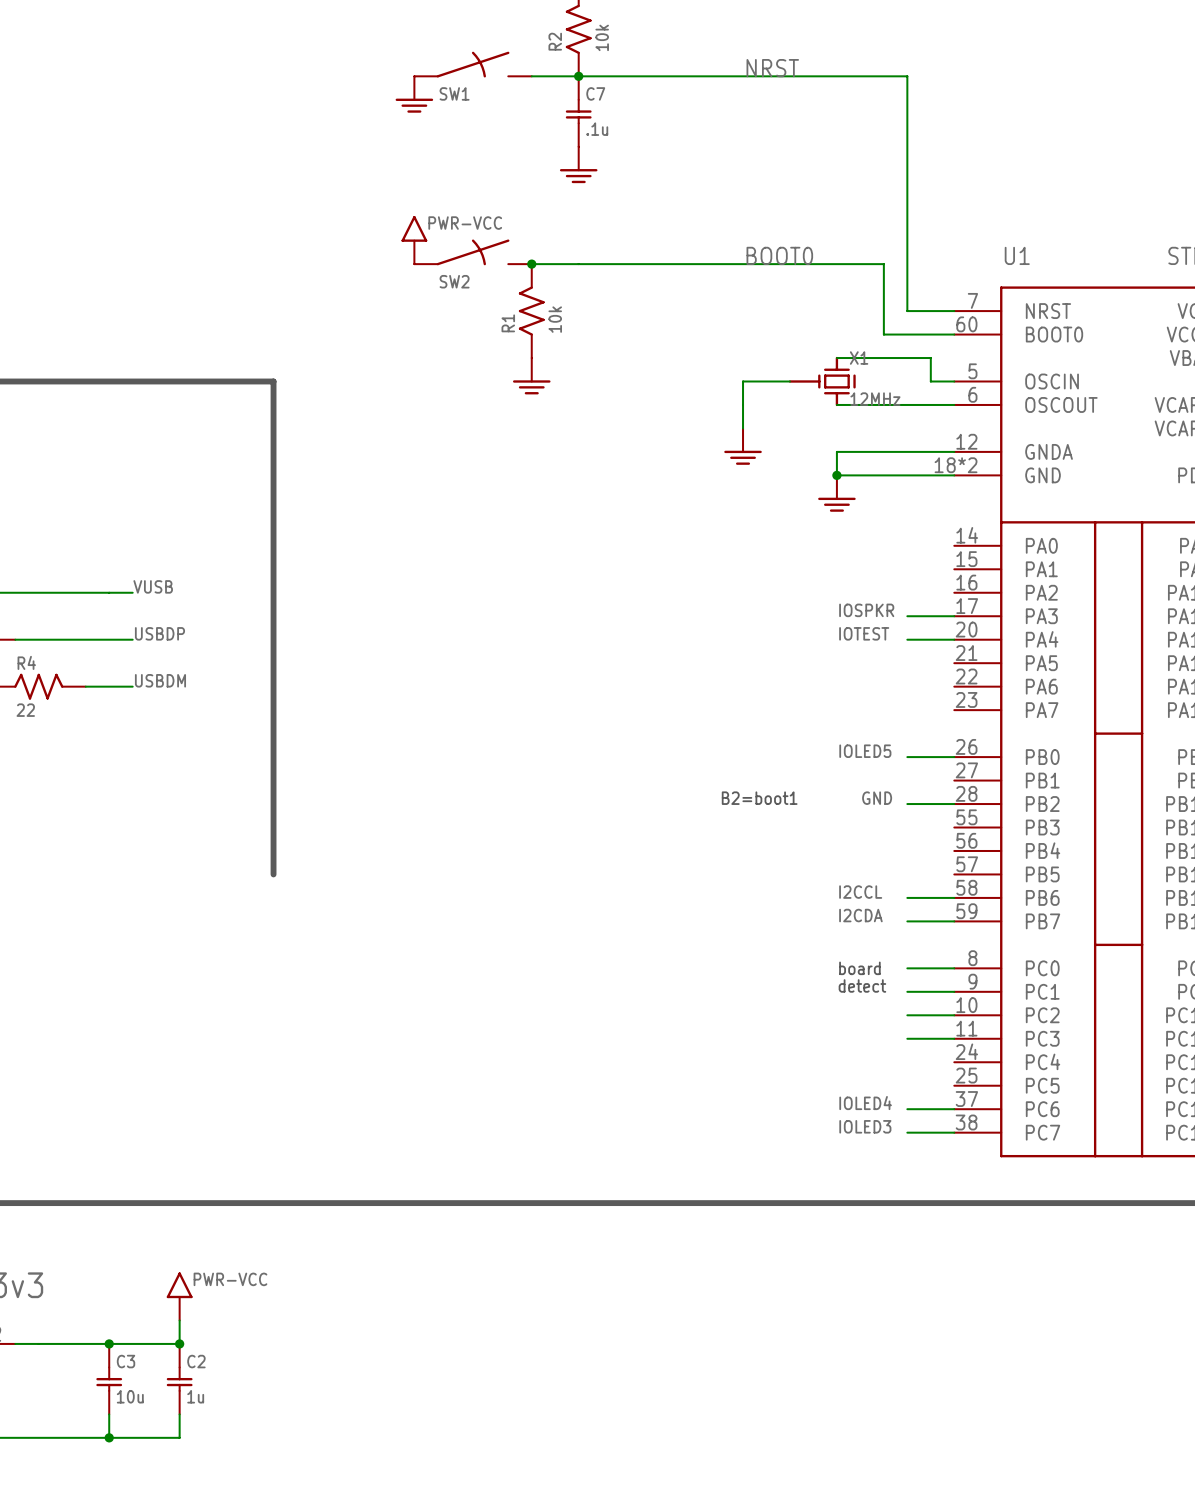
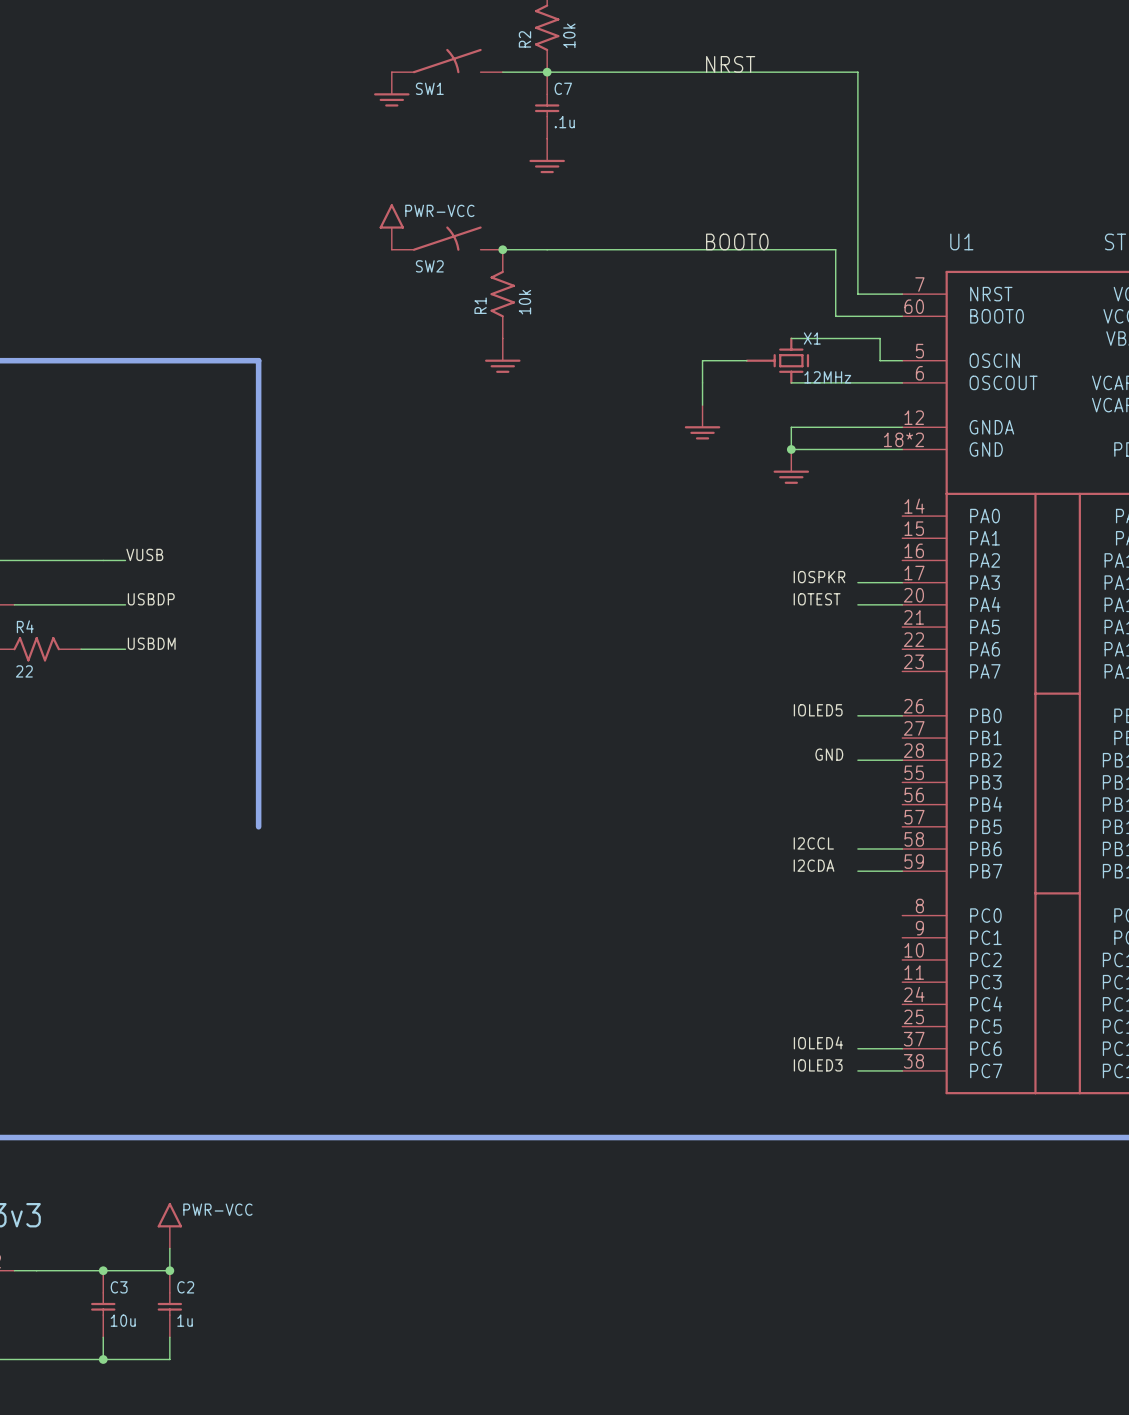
text: B2=boot1 (759, 798) -> none
text: board (859, 968) -> none
wire: (907, 968) (954, 968) -> none
text: detect (862, 985) -> none
wire: (907, 991) (954, 991) -> none
wire: (907, 1015) (954, 1015) -> none
wire: (907, 1038) (954, 1038) -> none

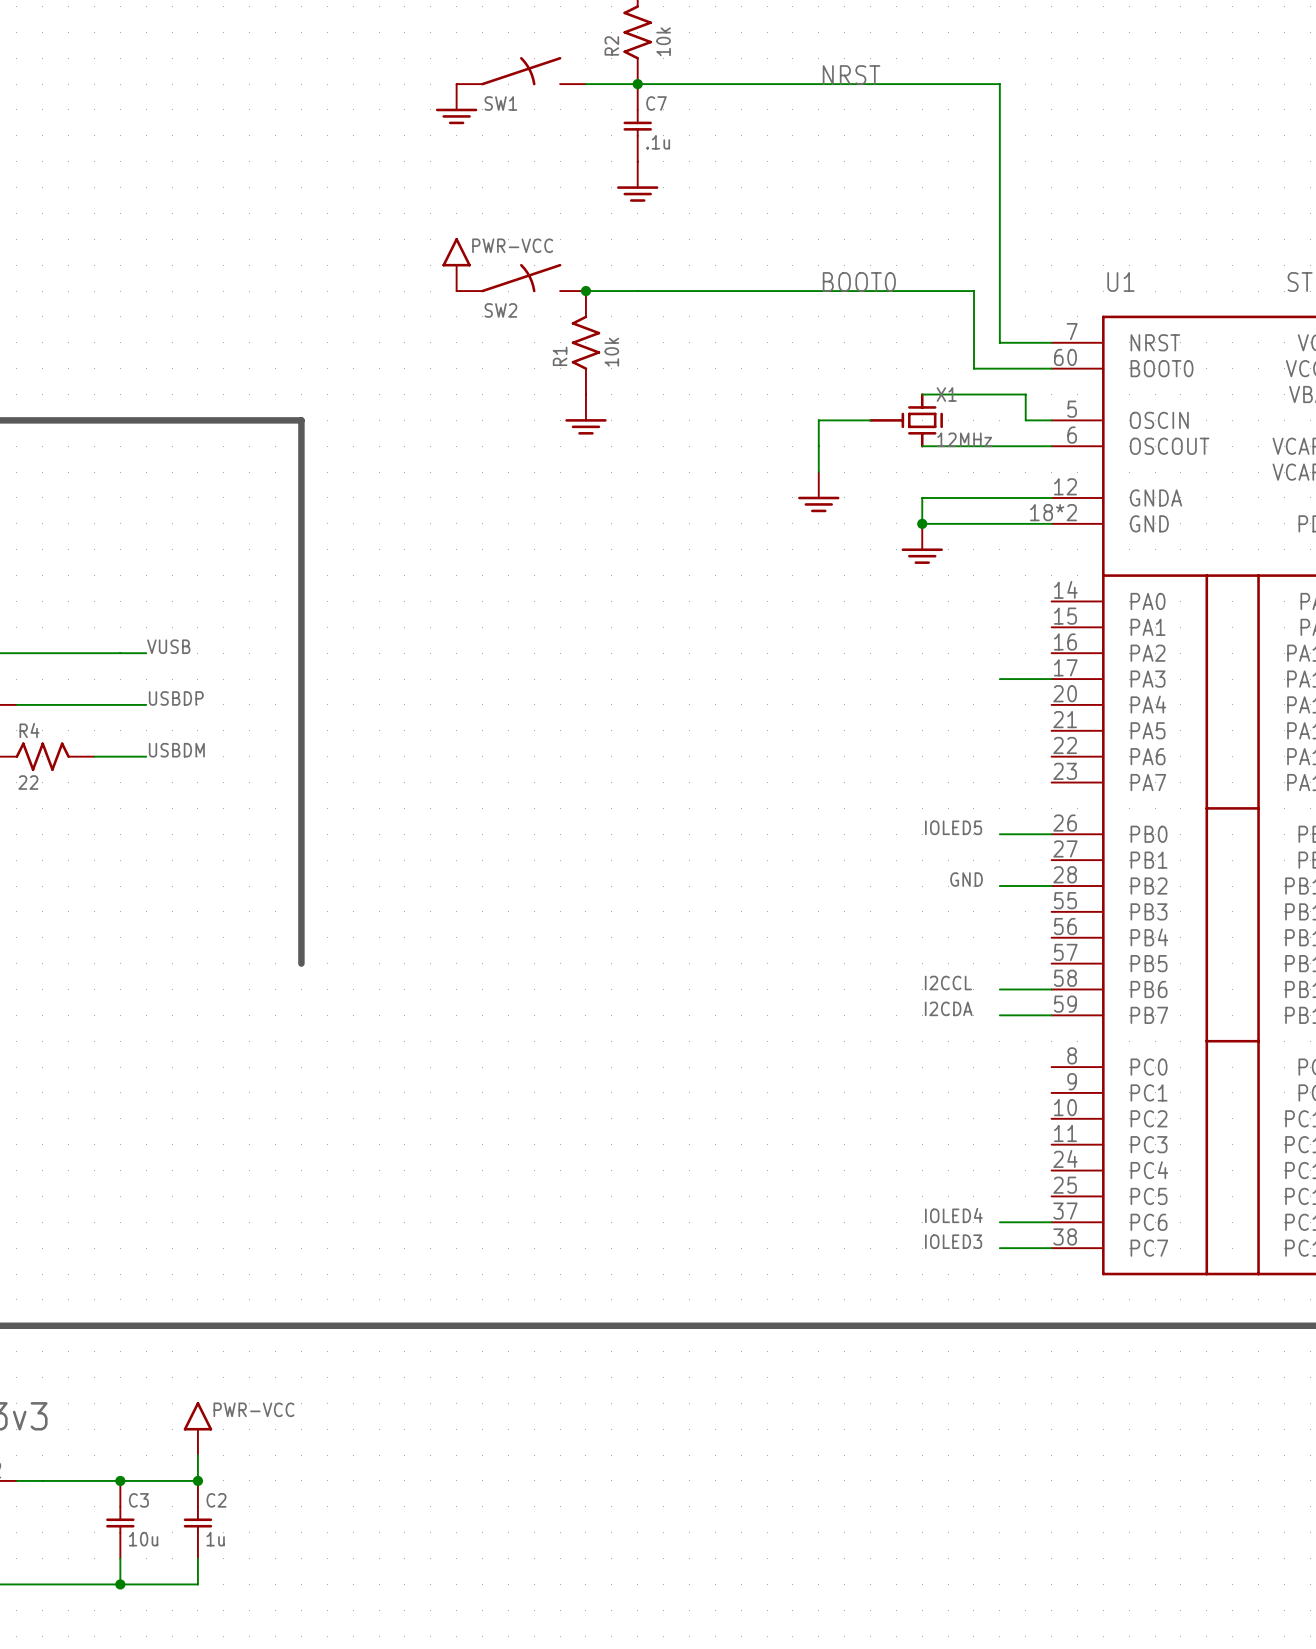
label: IOSPKR (819, 577) -> none
label: IOTEST (817, 599) -> none
wire: (857, 604) (902, 604) -> none

